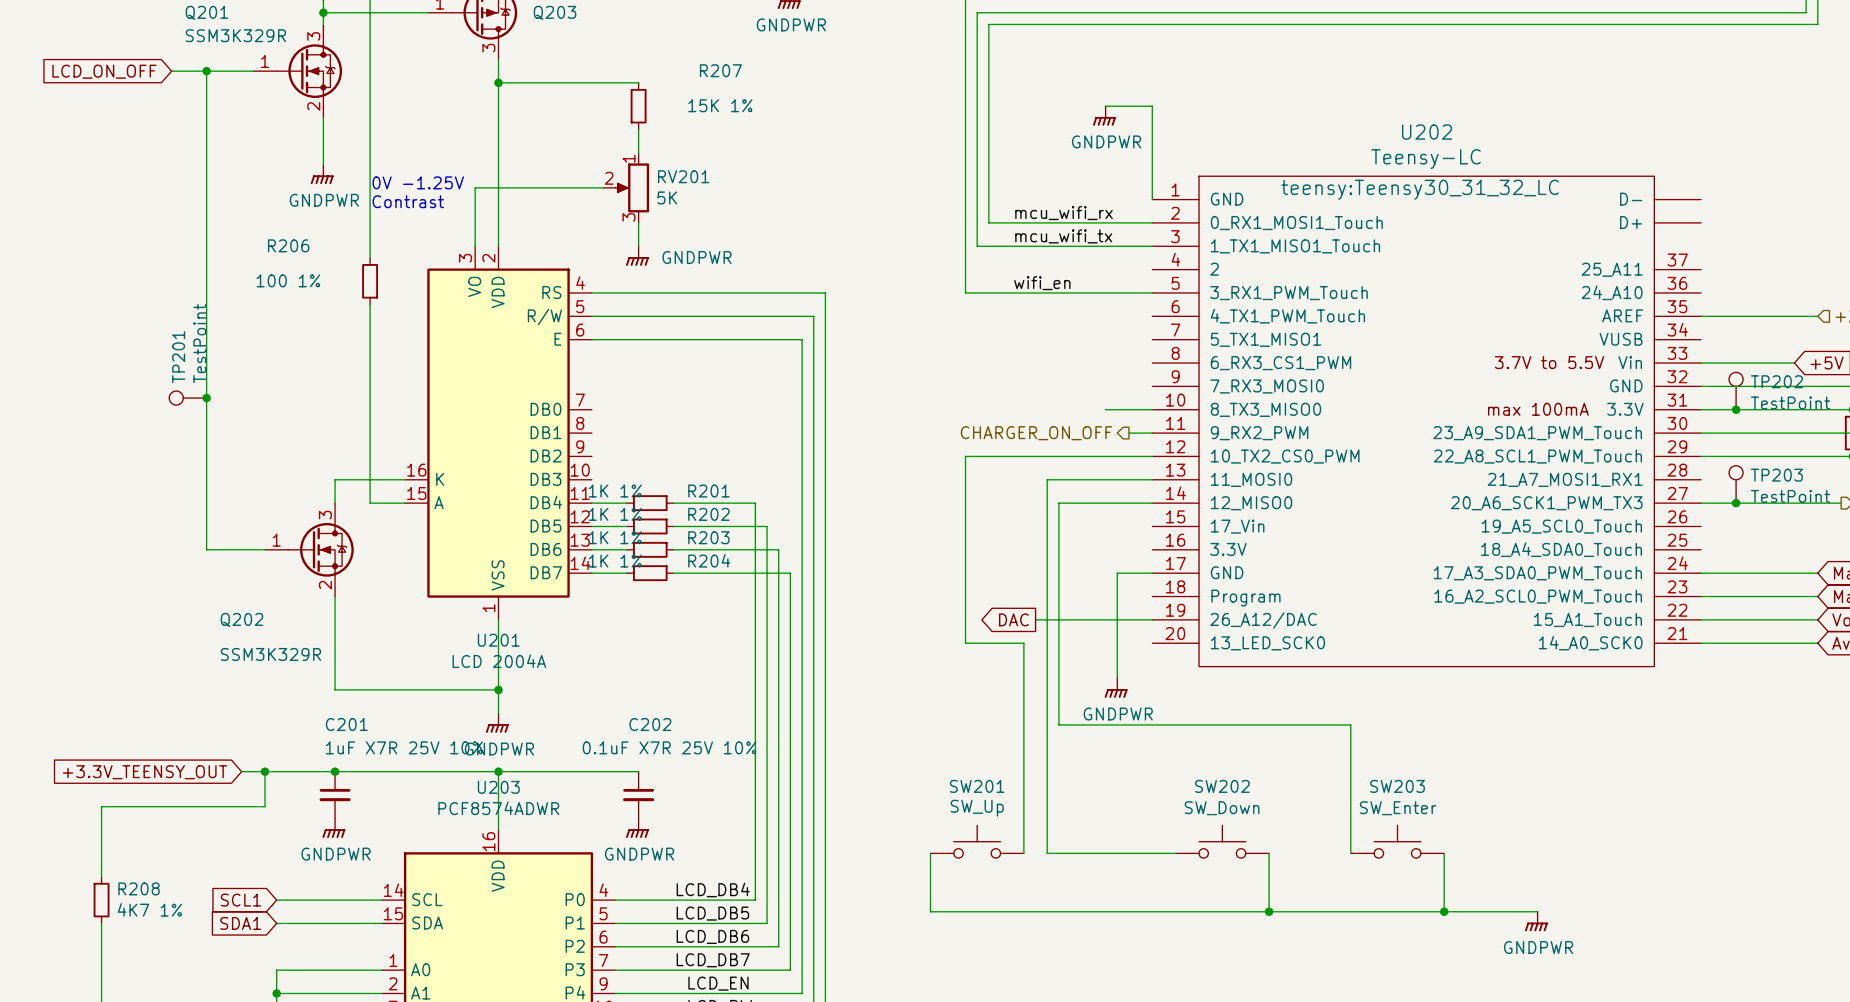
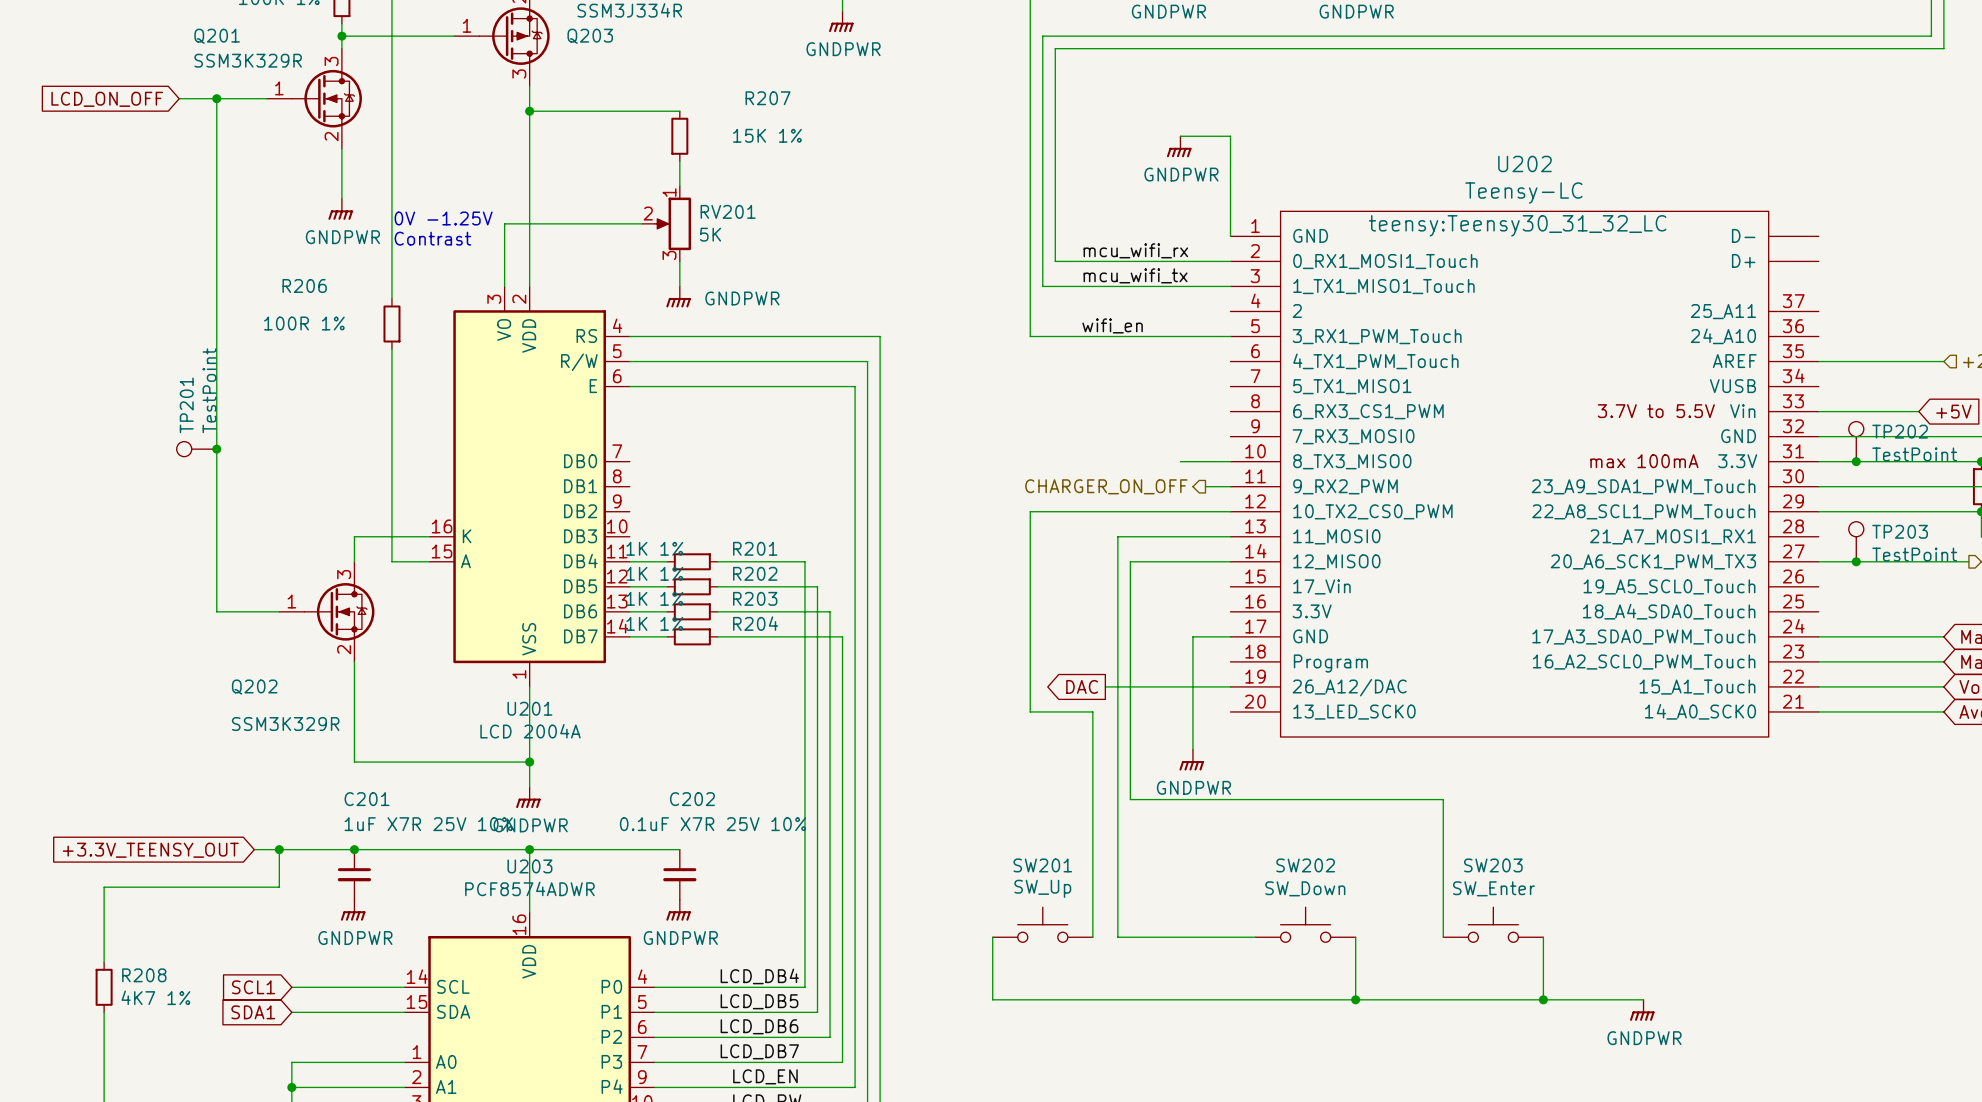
R206 value: 100 1% (288, 280) -> 100R 1% (304, 323)

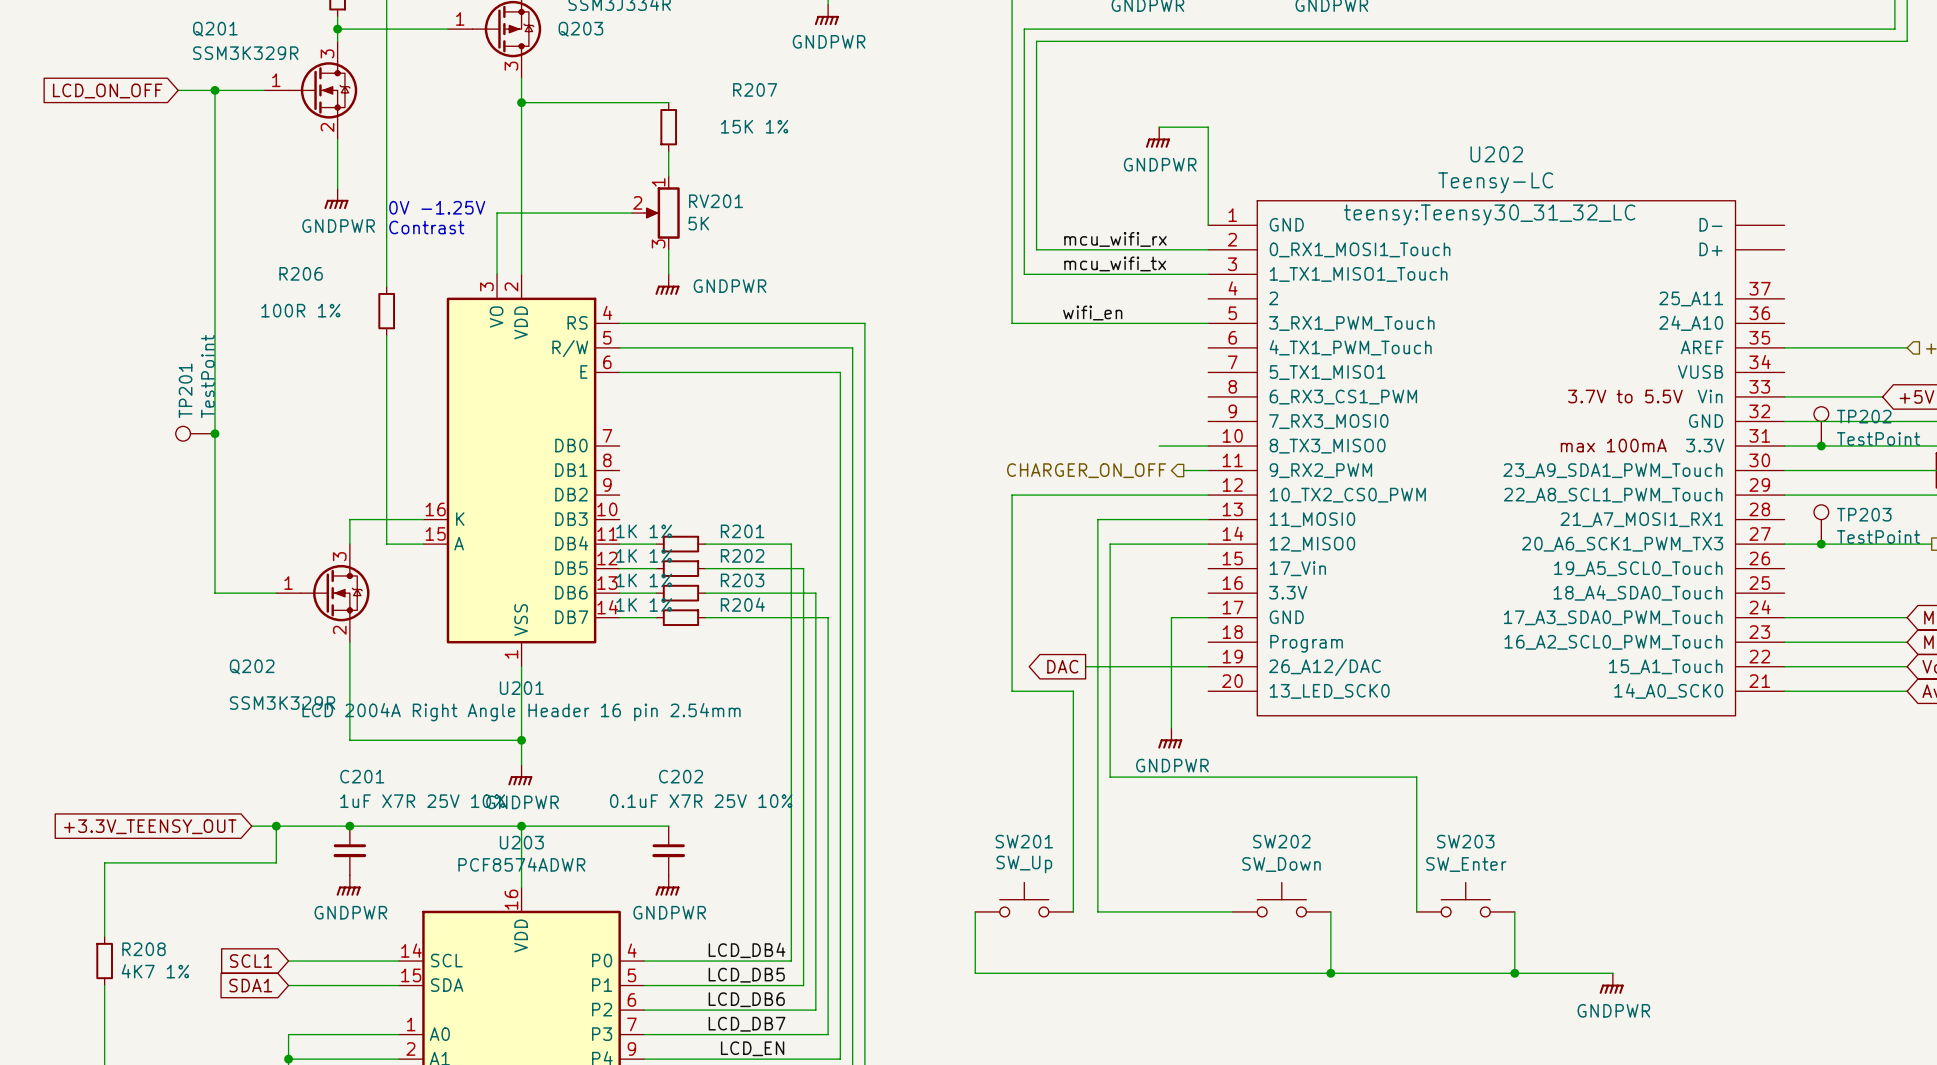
U201 value: LCD 2004A (530, 731) -> LCD 2004A Right Angle Header 16 pin 2.54mm (521, 712)

